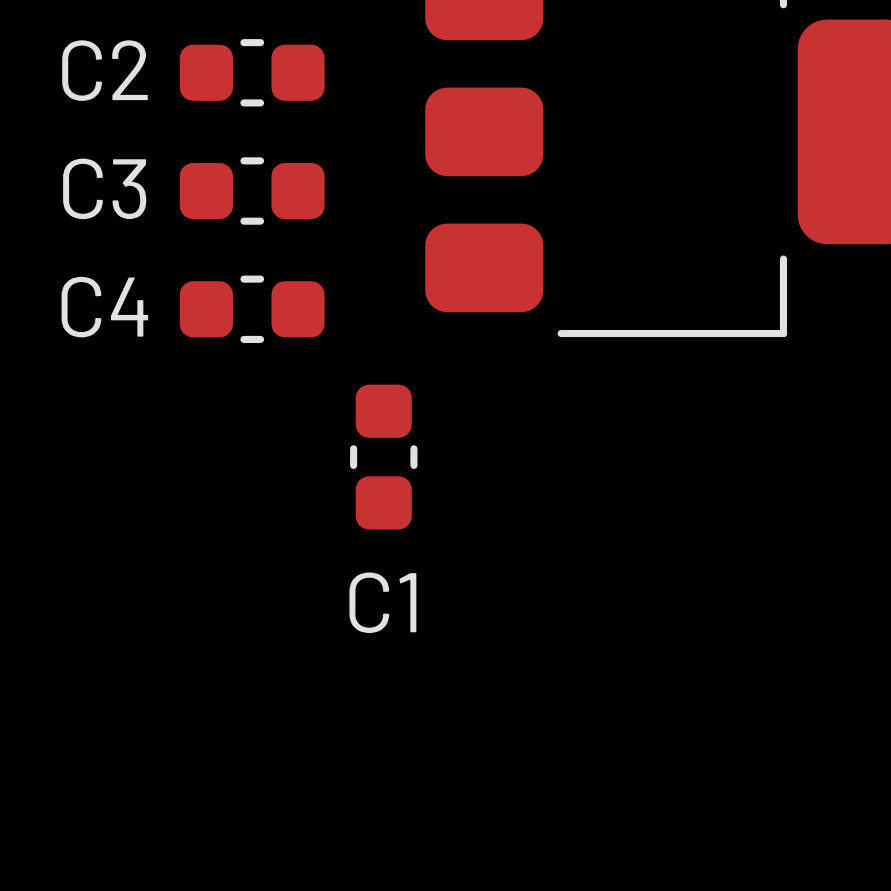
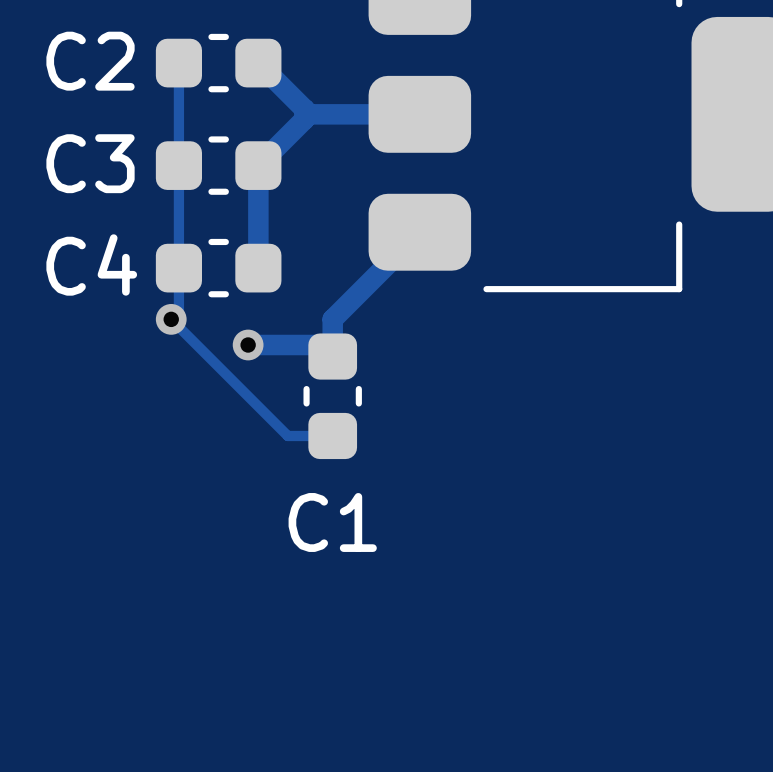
track: none -> (178, 63) (178, 311) (171, 319) (287, 435) (332, 435)
track: none -> (258, 63) (309, 114) (419, 114)
track: none -> (304, 109) (304, 119) (258, 165) (258, 268)
track: none -> (419, 232) (332, 319) (332, 356) (321, 345) (248, 345)
via: none -> (171, 319)
via: none -> (248, 345)

